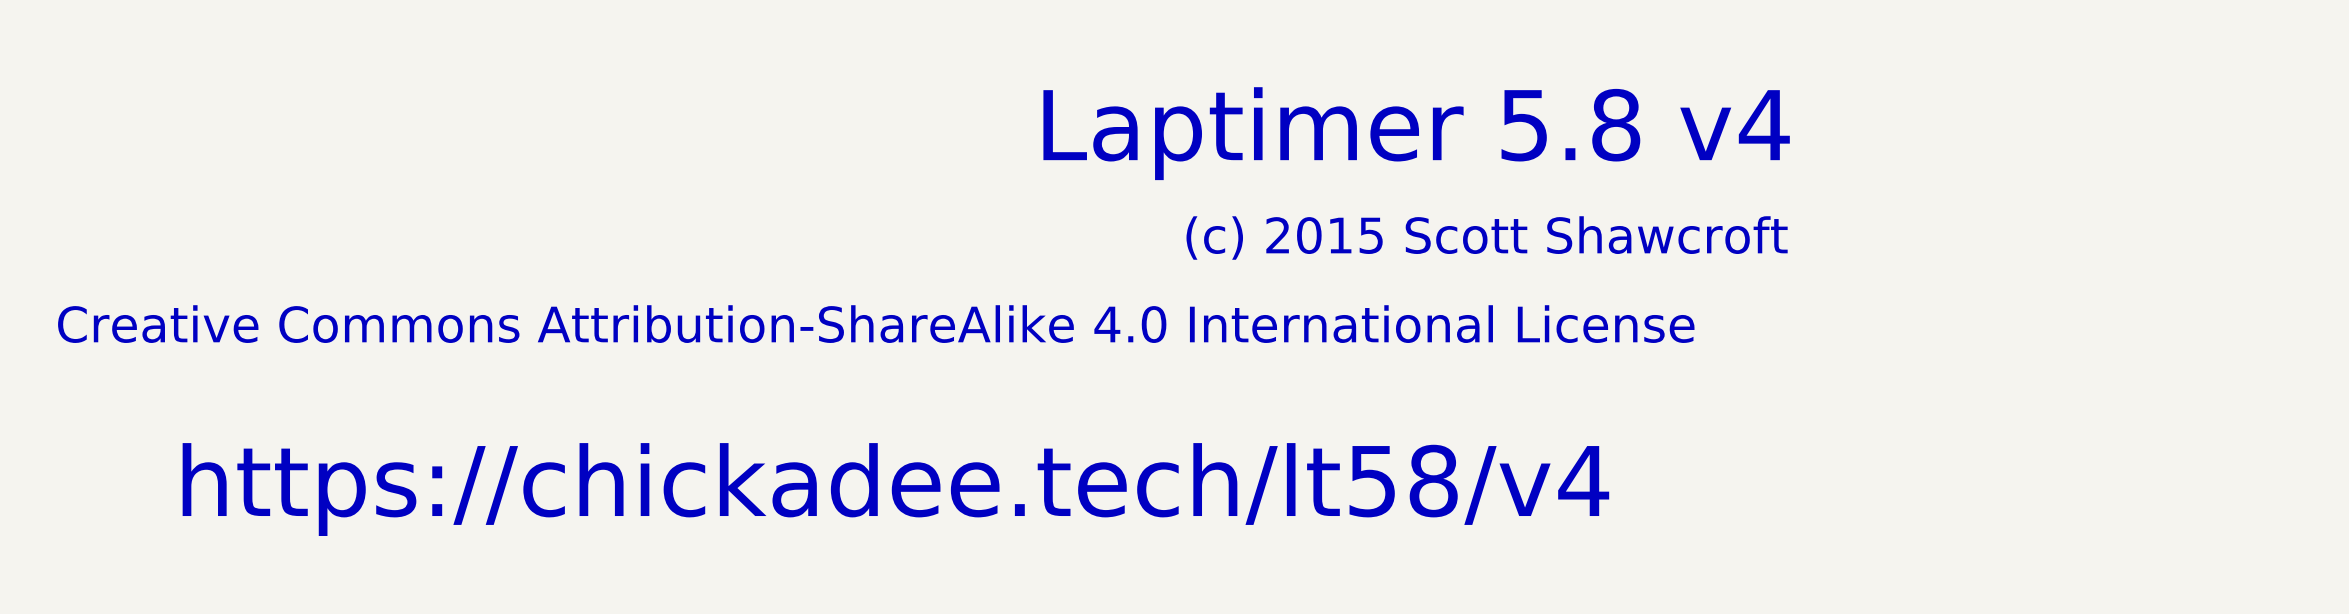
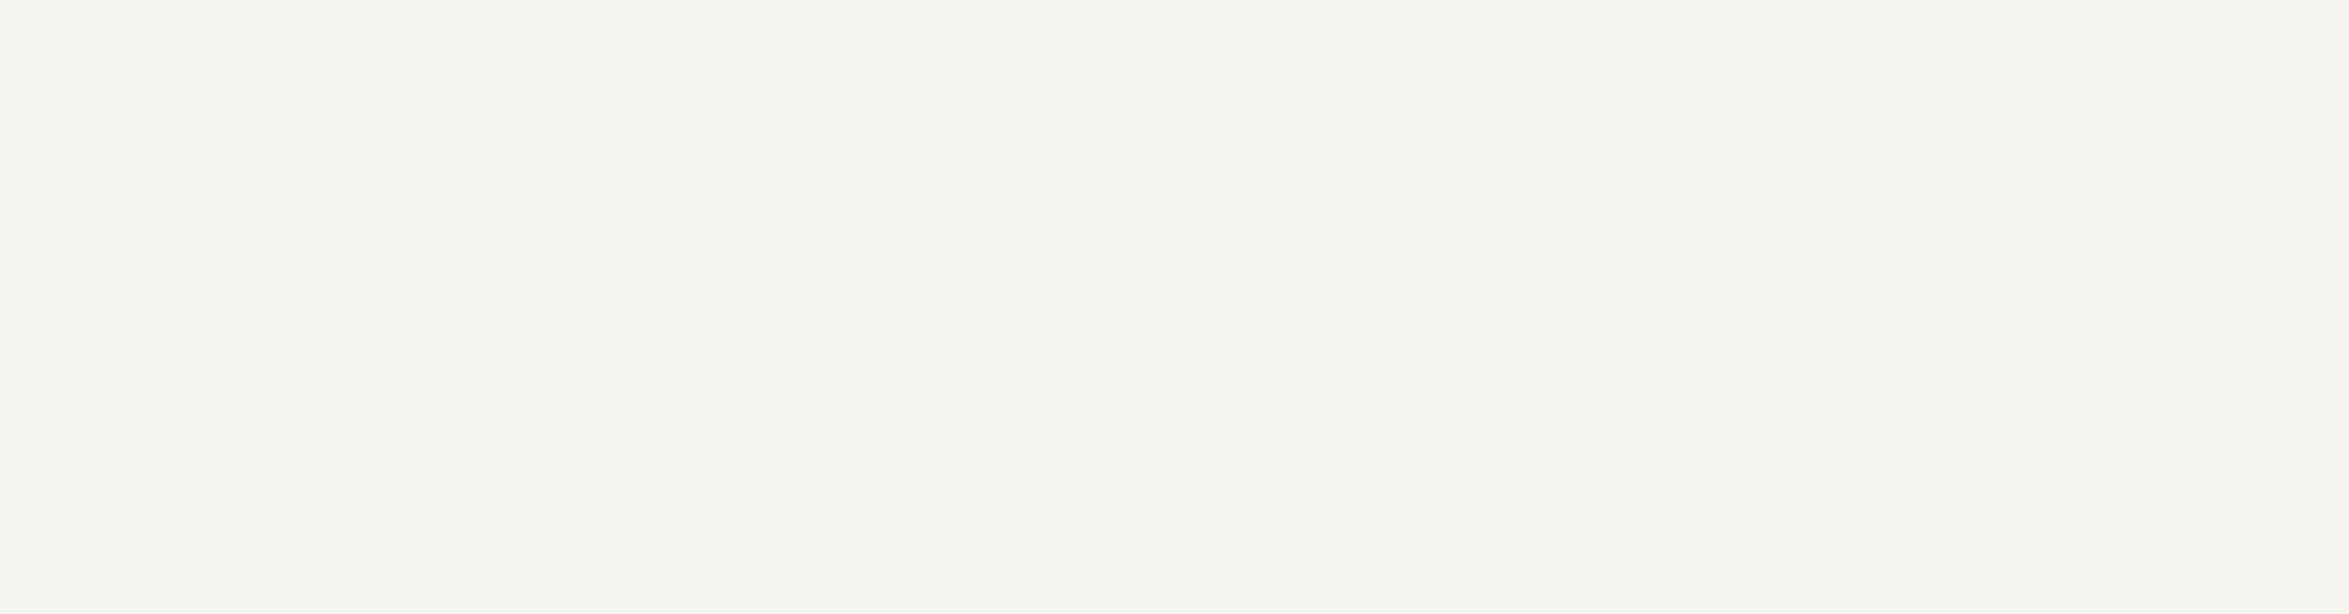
text: Laptimer 5.8 v4 (1416, 133) -> none
text: (c) 2015 Scott Shawcroft (1487, 237) -> none
text: Creative Commons Attribution-ShareAlike 4.0 International License (876, 324) -> none
text: https://chickadee.tech/lt58/v4 (895, 489) -> none

